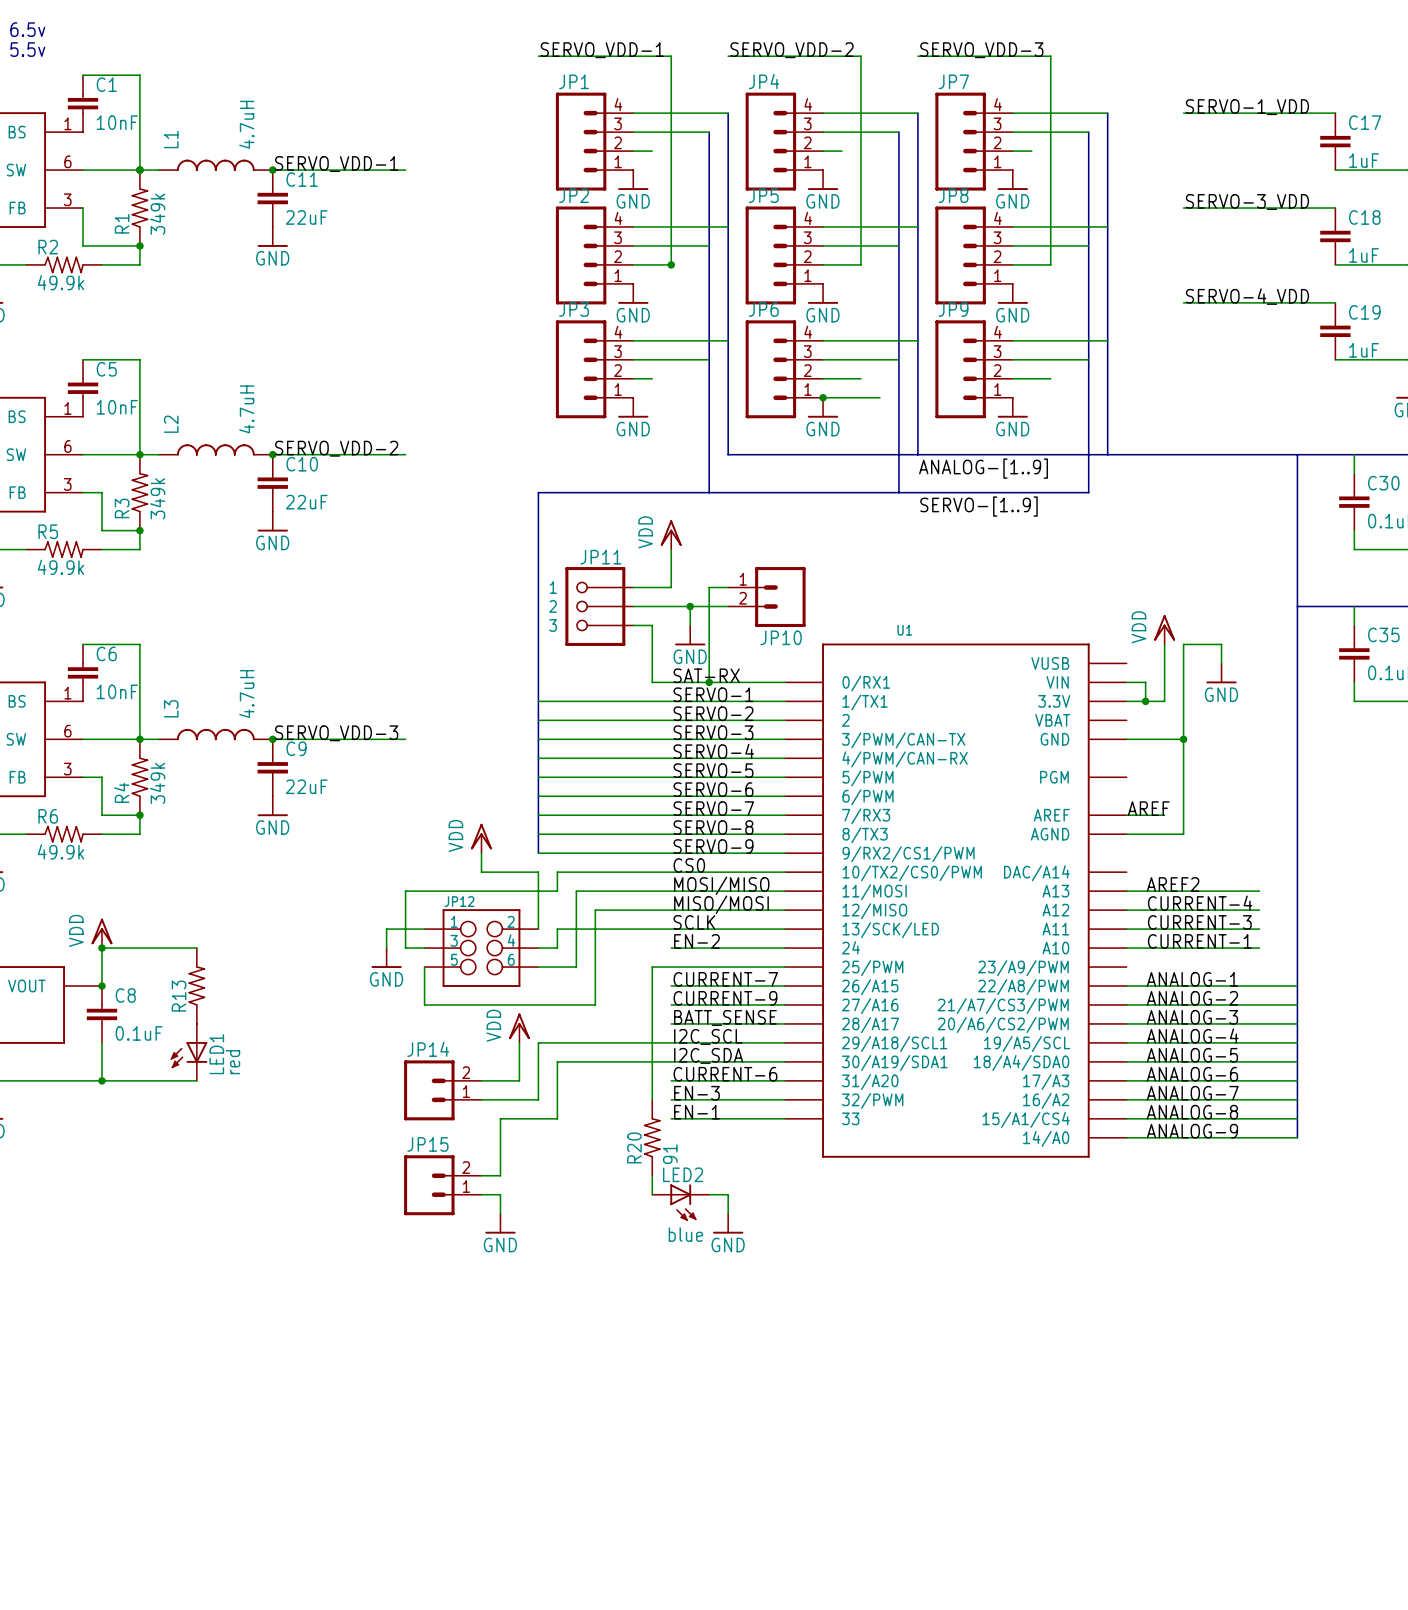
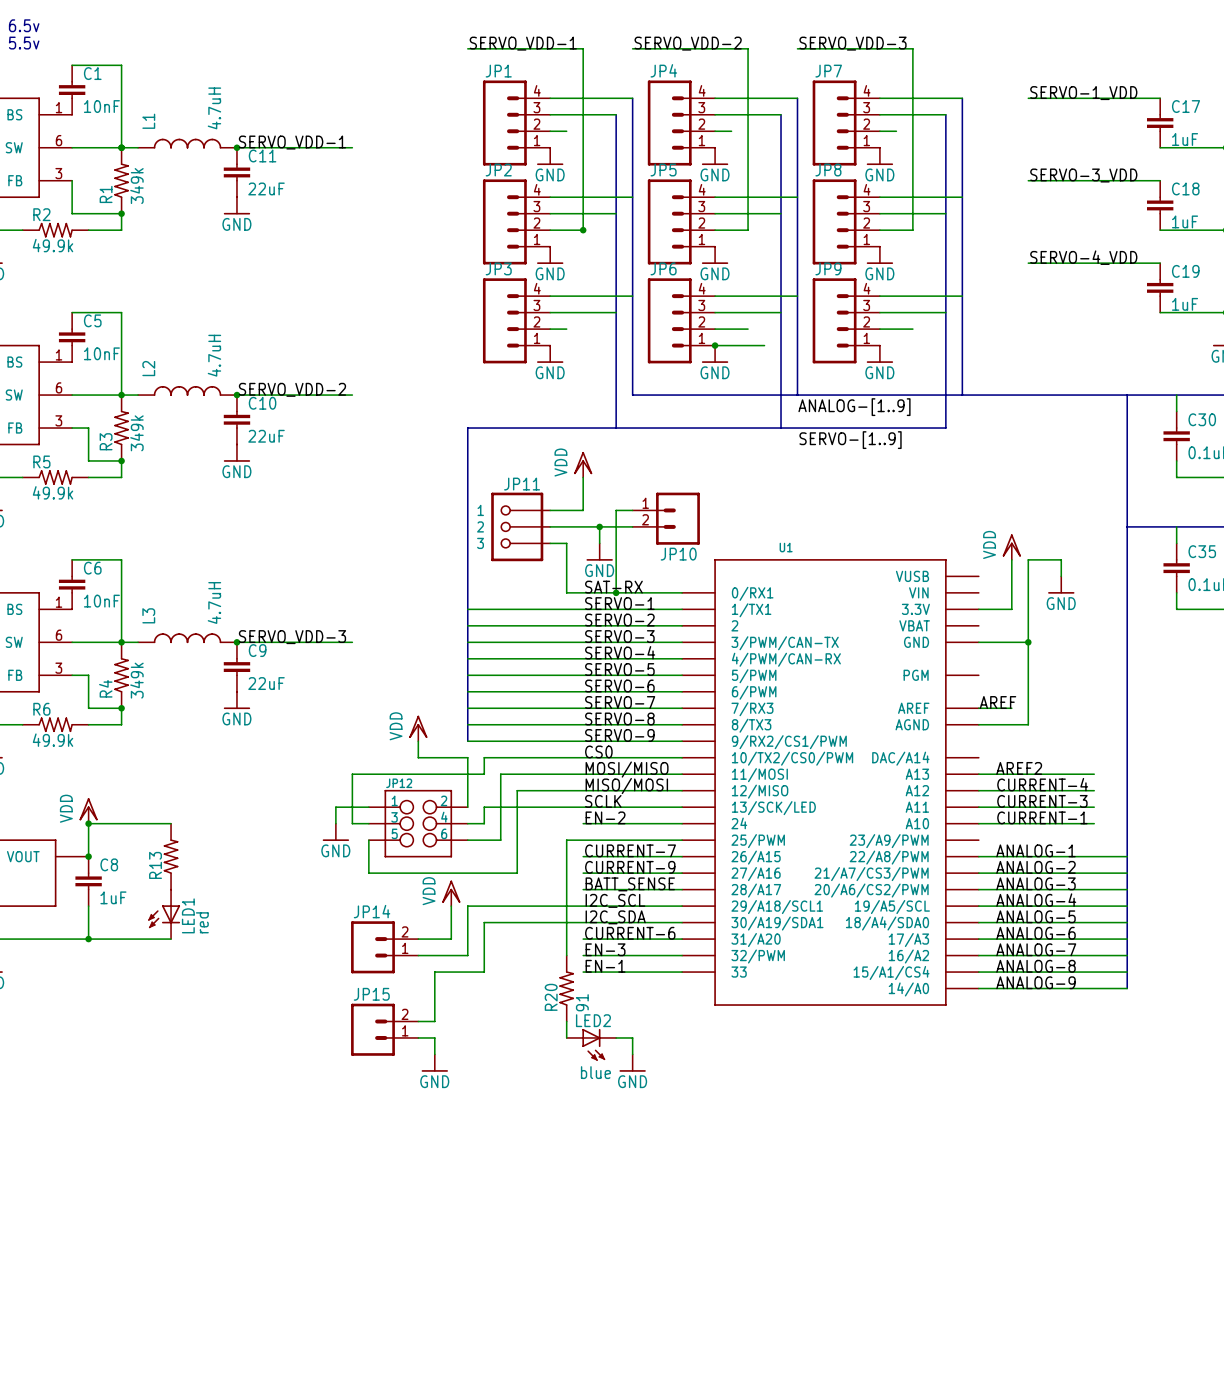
wire: (1126, 682) (1145, 682) (1145, 701) -> none
junction: (1145, 701) -> none
C8 value: 0.1uF (139, 1033) -> 1uF (113, 897)

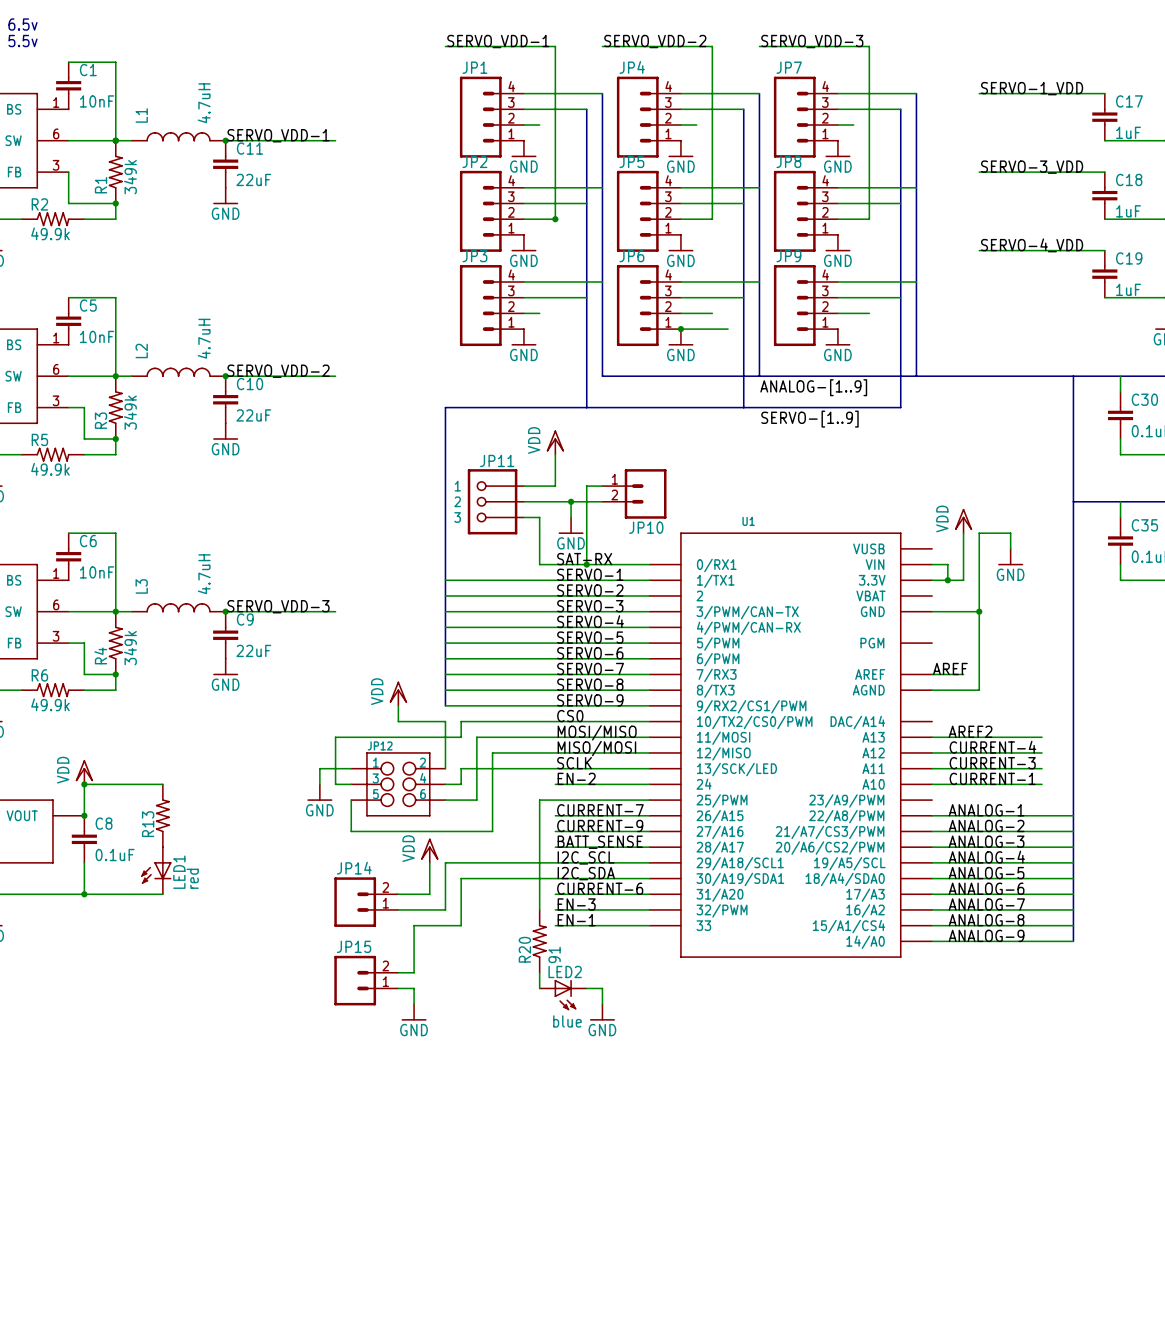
wire: none -> (932, 564) (947, 564) (947, 580)
junction: none -> (947, 580)
C8 value: 1uF (113, 897) -> 0.1uF (115, 855)

